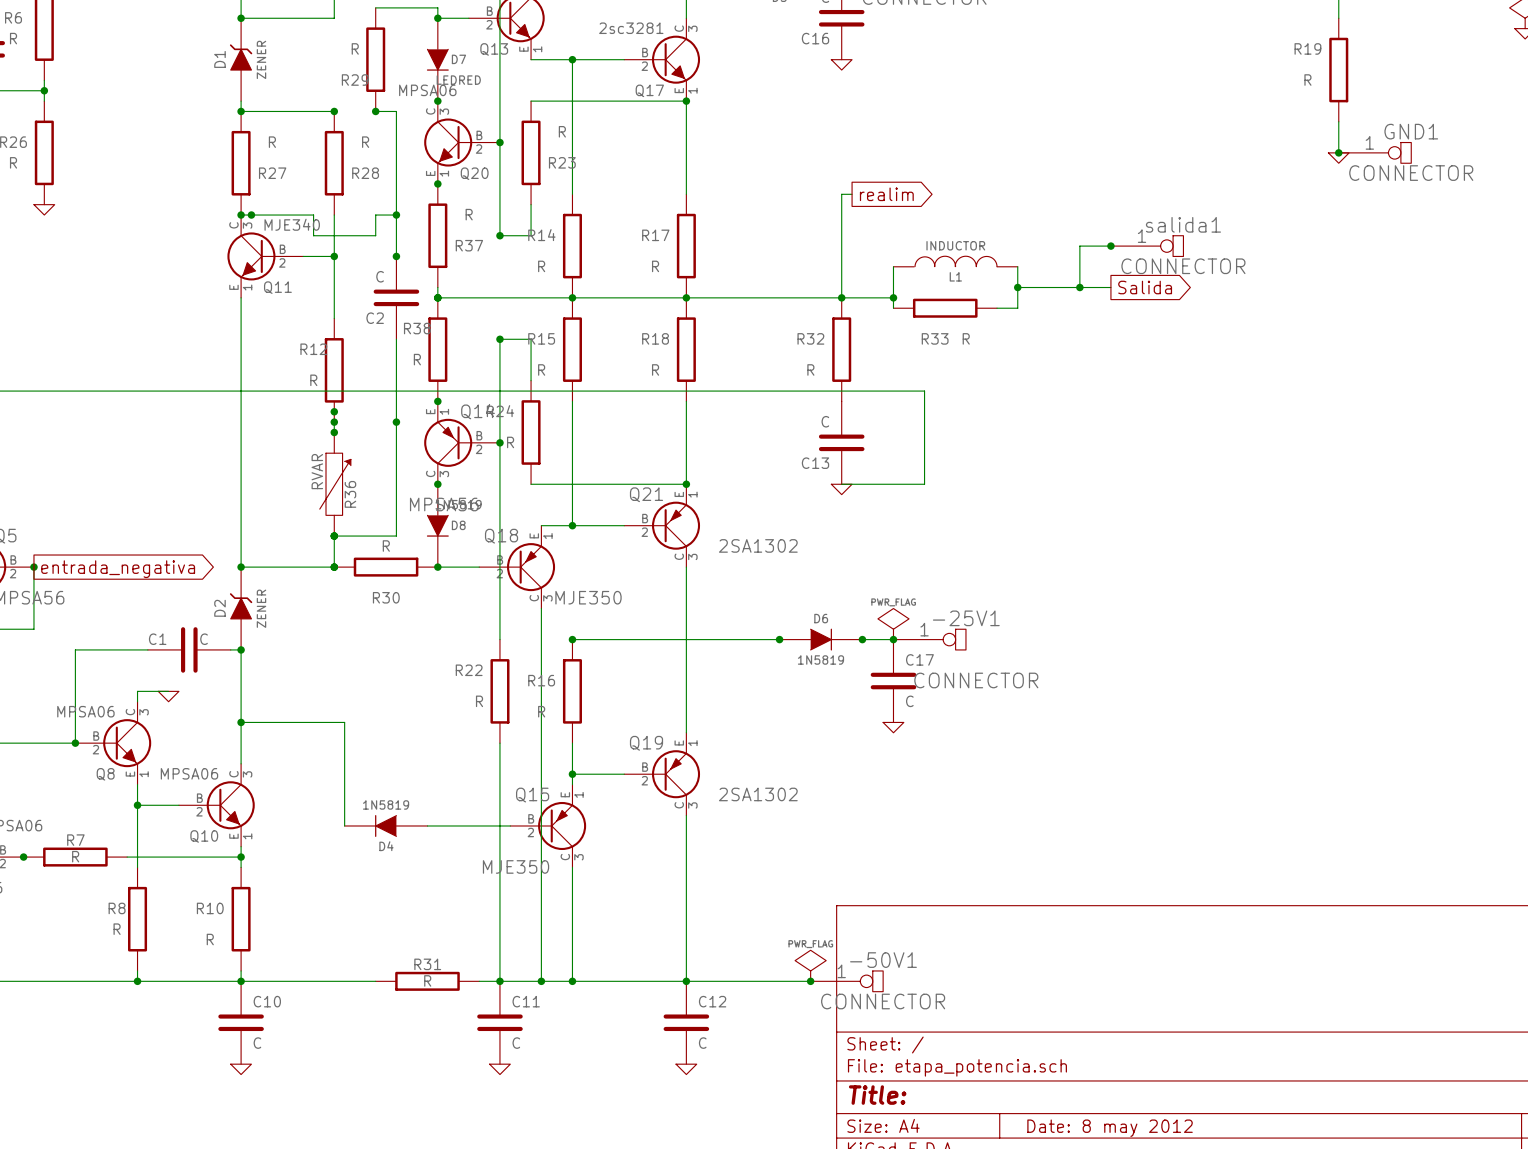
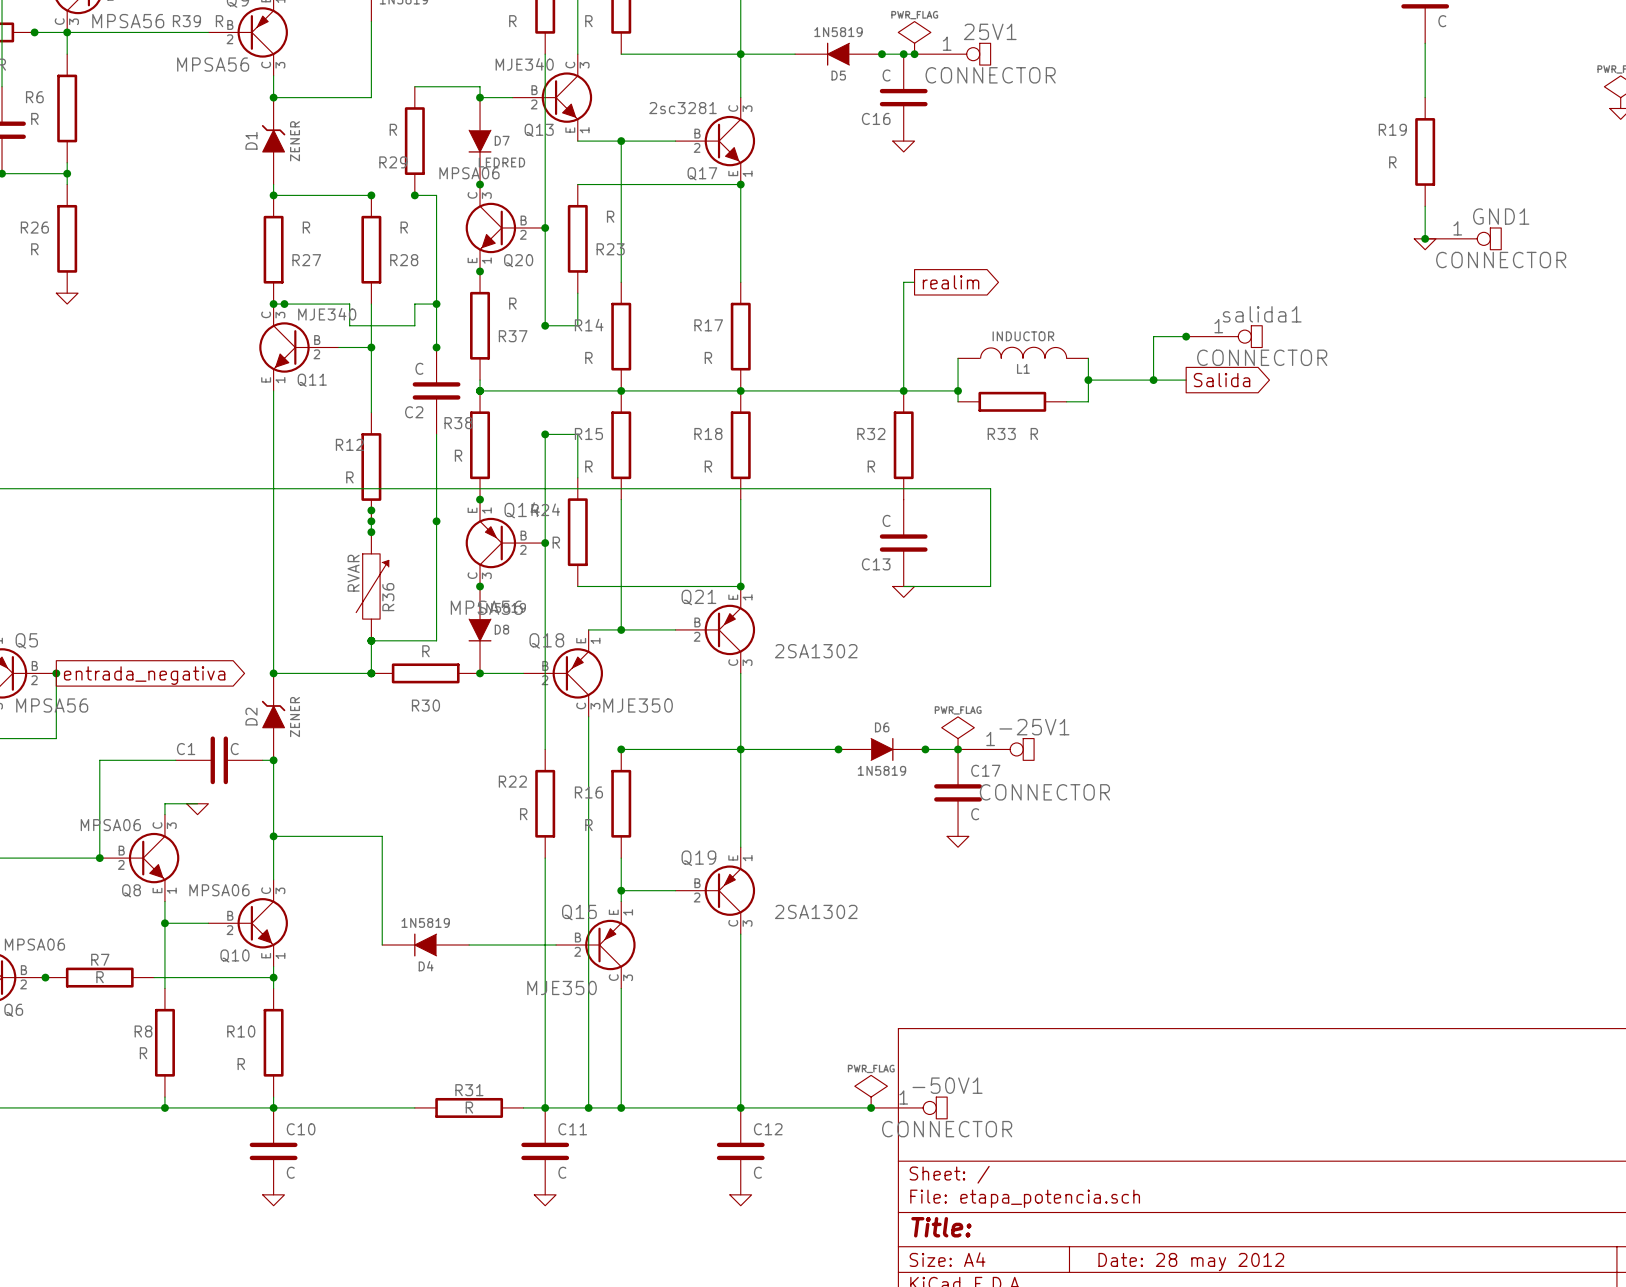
junction: none -> (740, 749)
title block: Date: 8 may 2012 (1110, 1128) -> Date: 28 may 2012 (1191, 1262)

